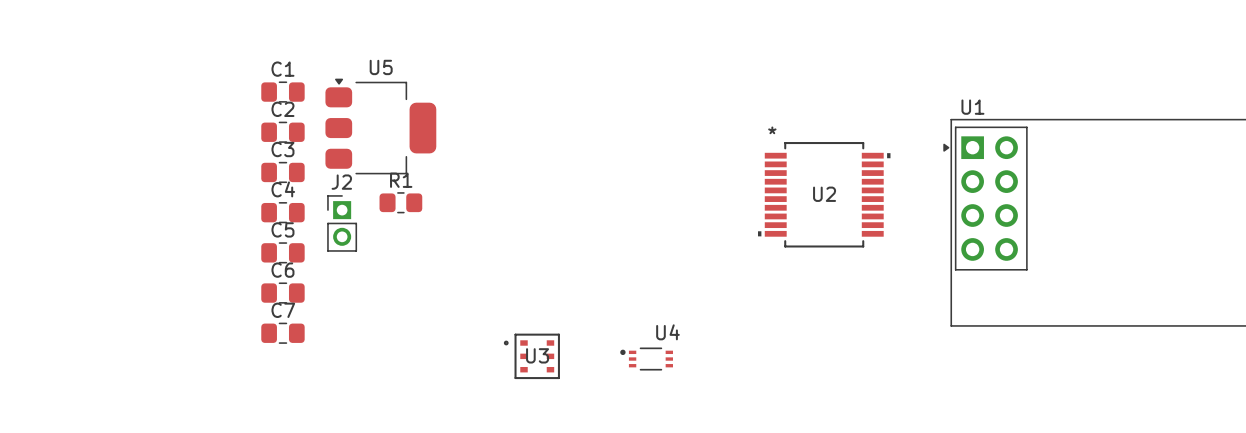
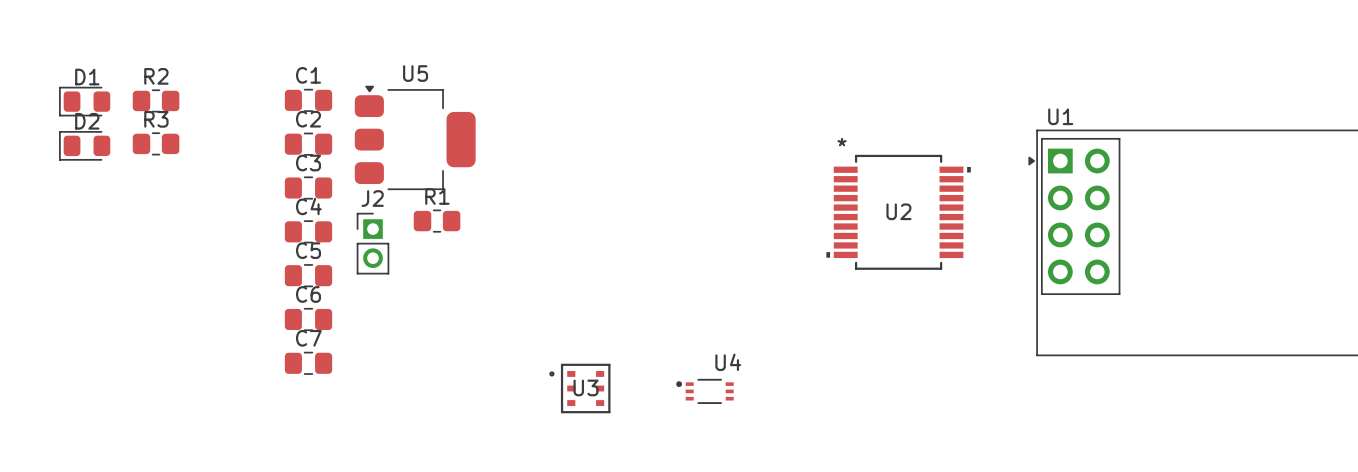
R2: none -> (156, 100)
D1: none -> (84, 101)
R3: none -> (156, 143)
D2: none -> (84, 145)

